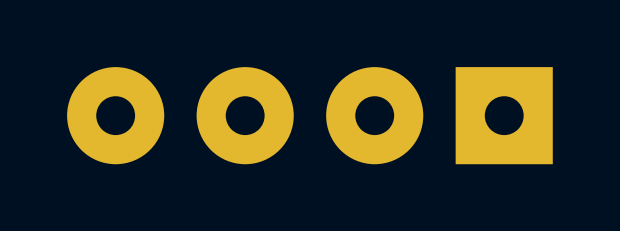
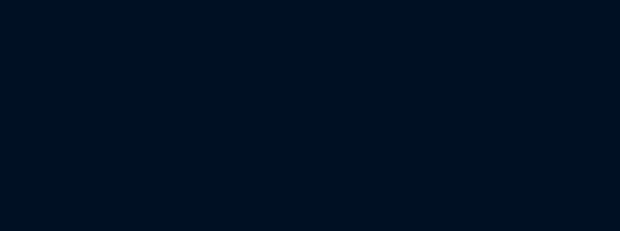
part: (309, 115) -> none

